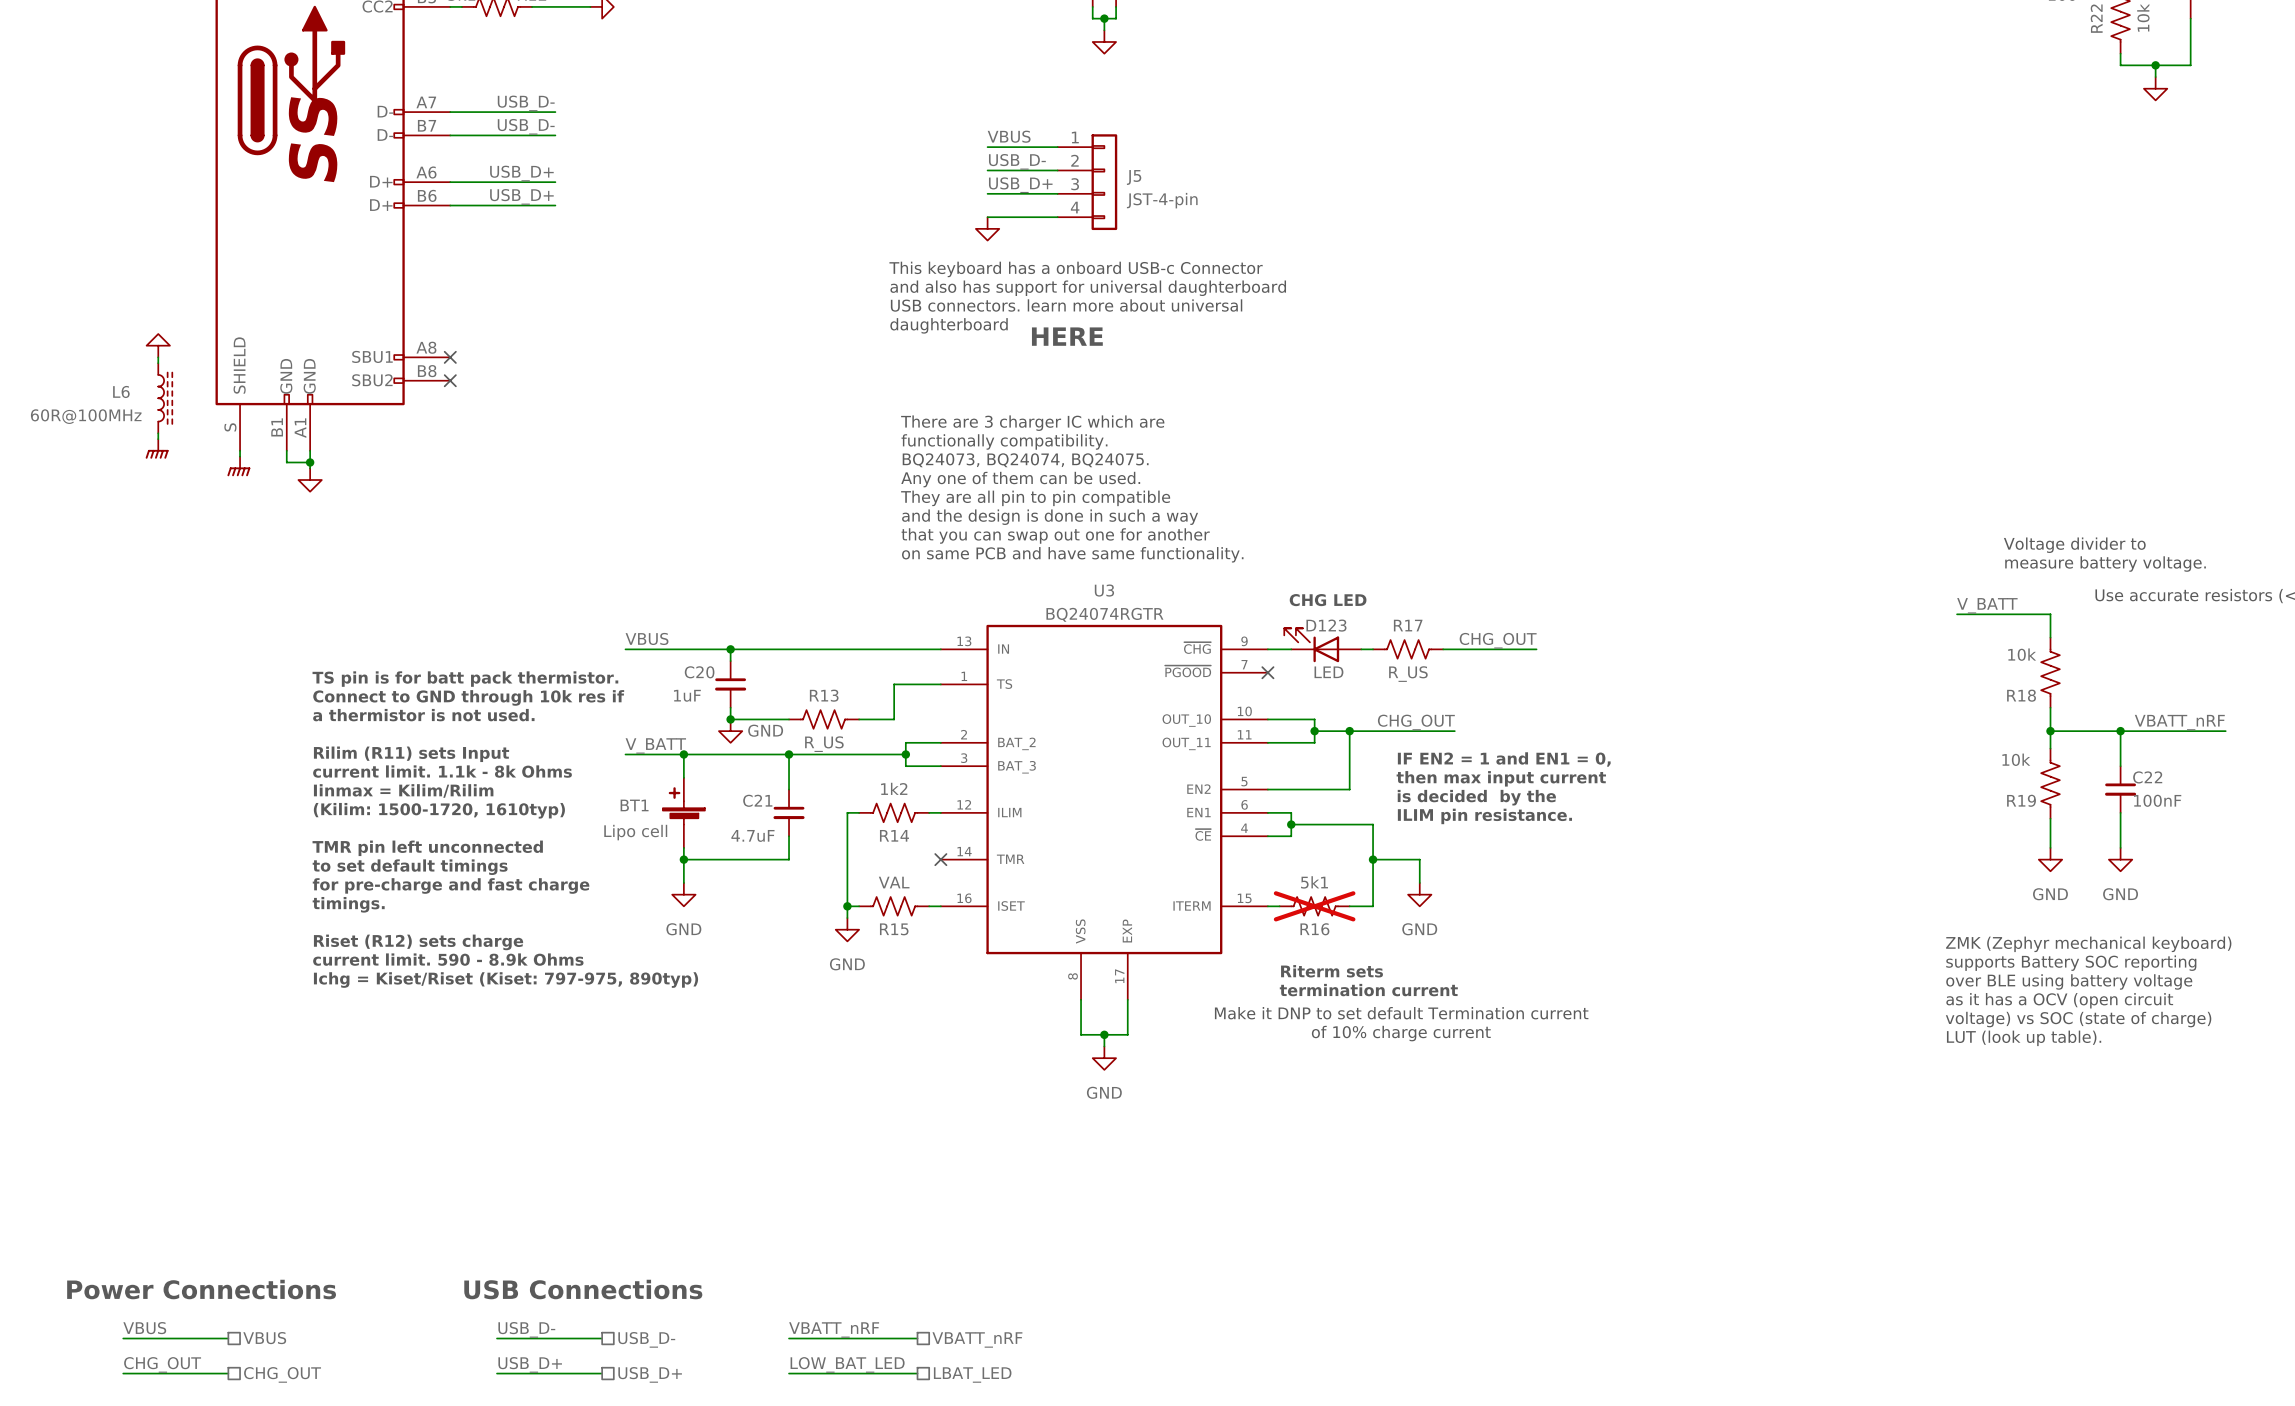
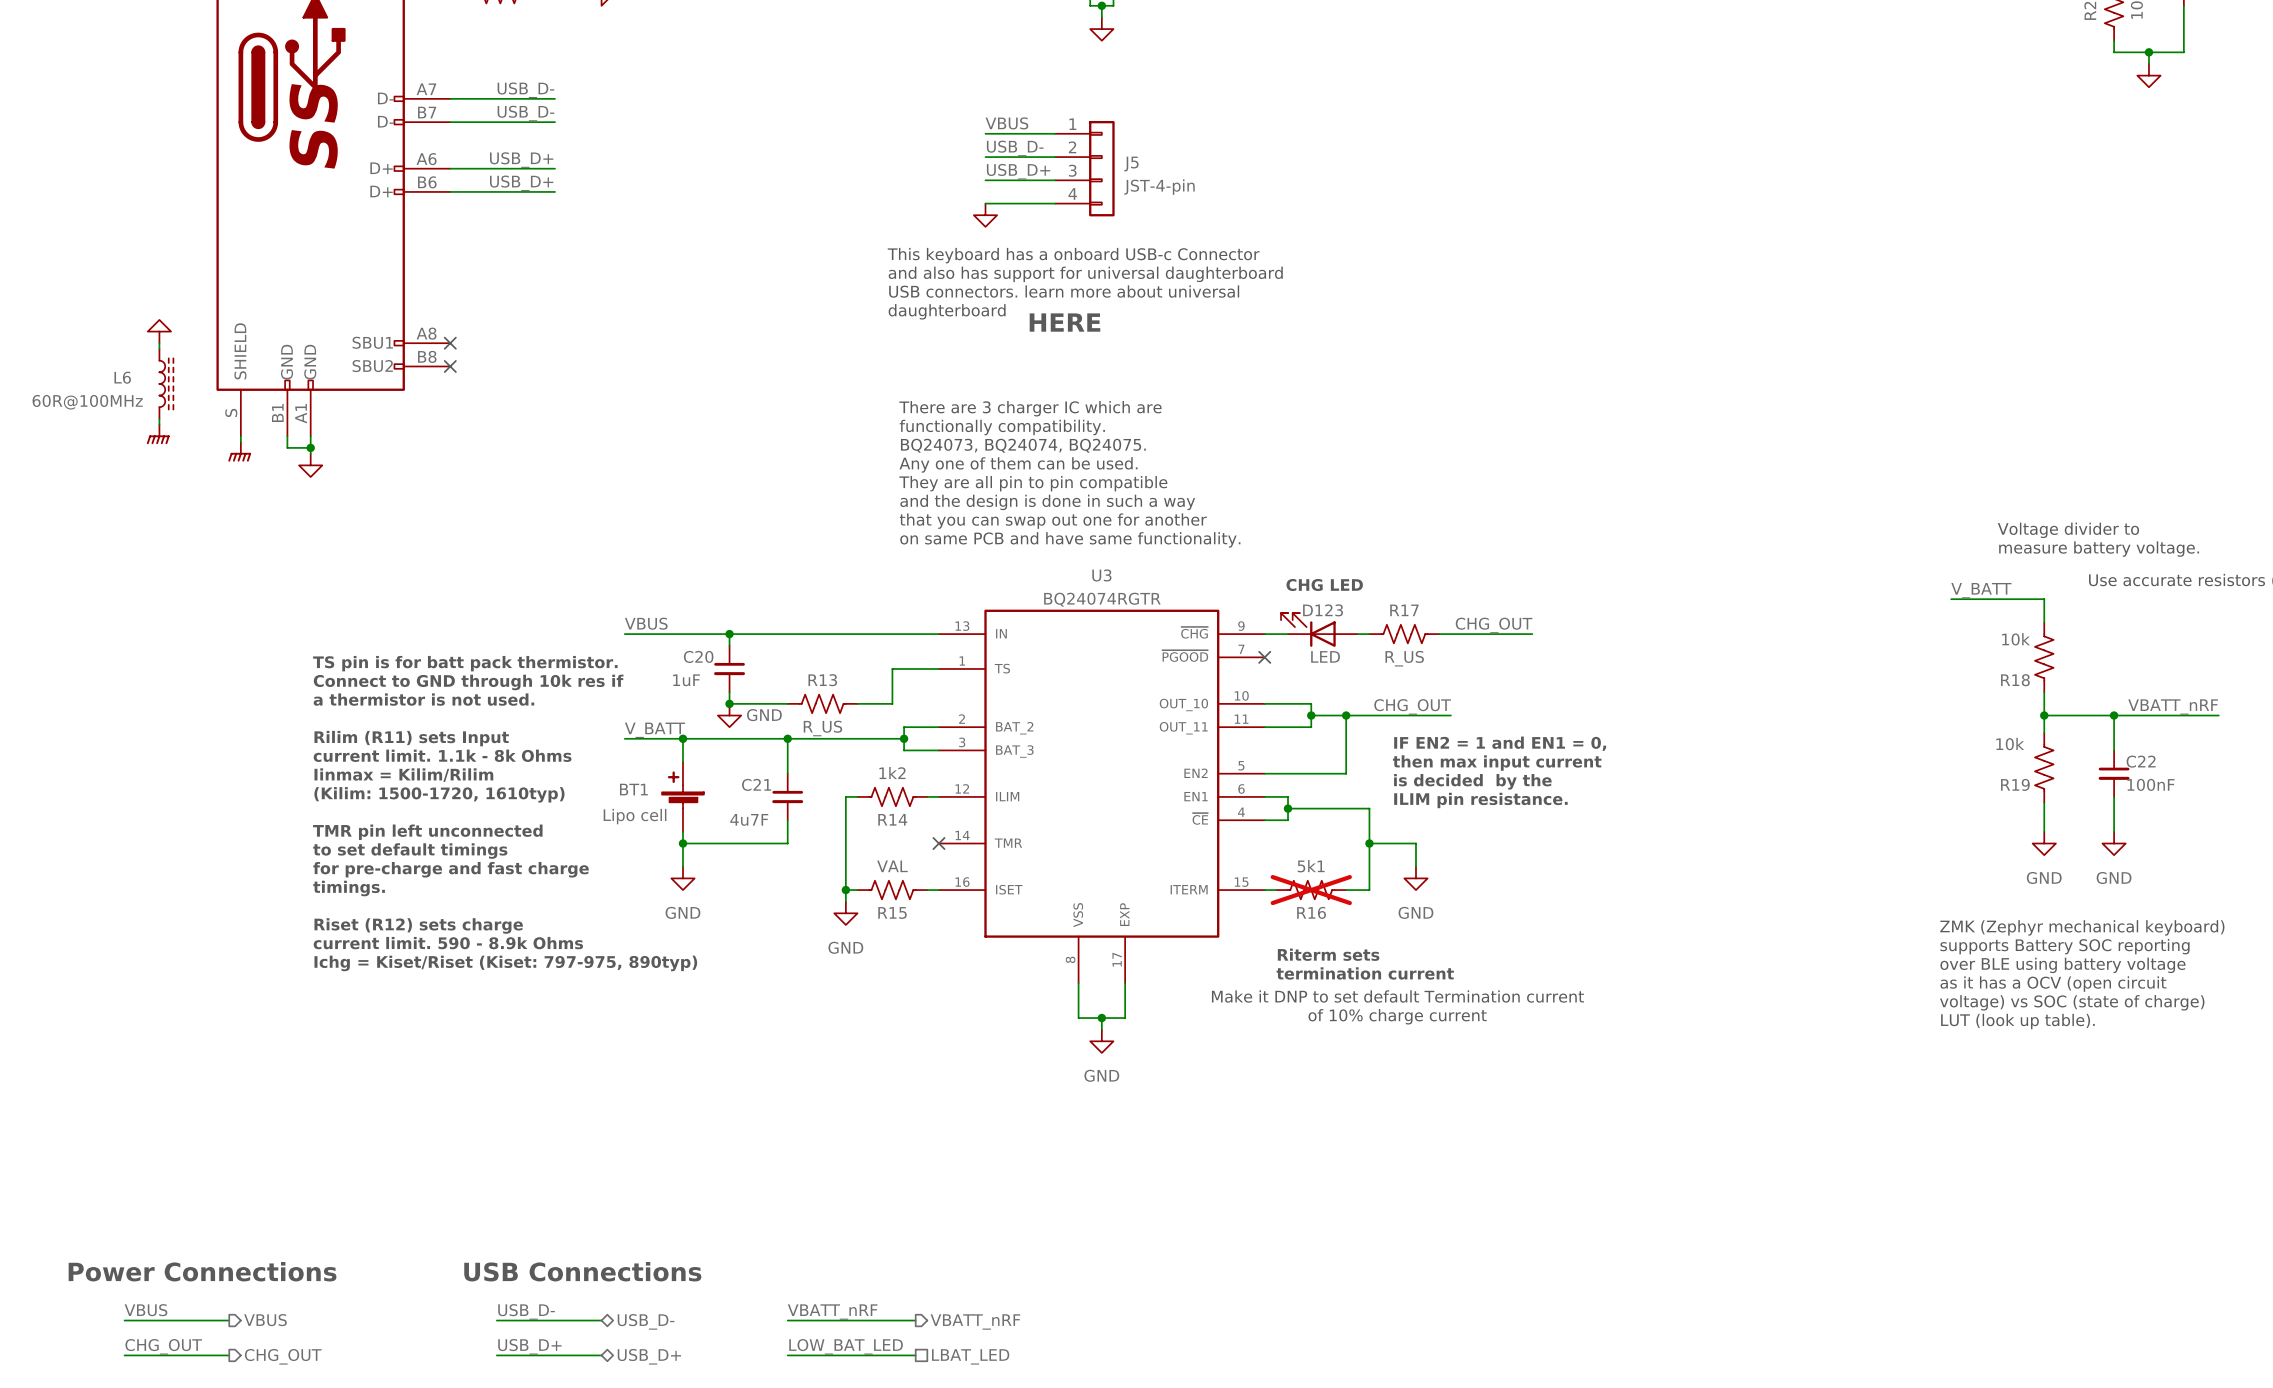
C21 value: 4.7uF (752, 835) -> 4u7F (749, 819)
hierarchical label shape: passive (264, 1338) -> output (265, 1320)
hierarchical label shape: passive (646, 1339) -> bidirectional (646, 1321)
hierarchical label shape: passive (977, 1339) -> output (975, 1321)
hierarchical label shape: passive (282, 1374) -> output (283, 1356)
hierarchical label shape: passive (650, 1374) -> bidirectional (649, 1356)

